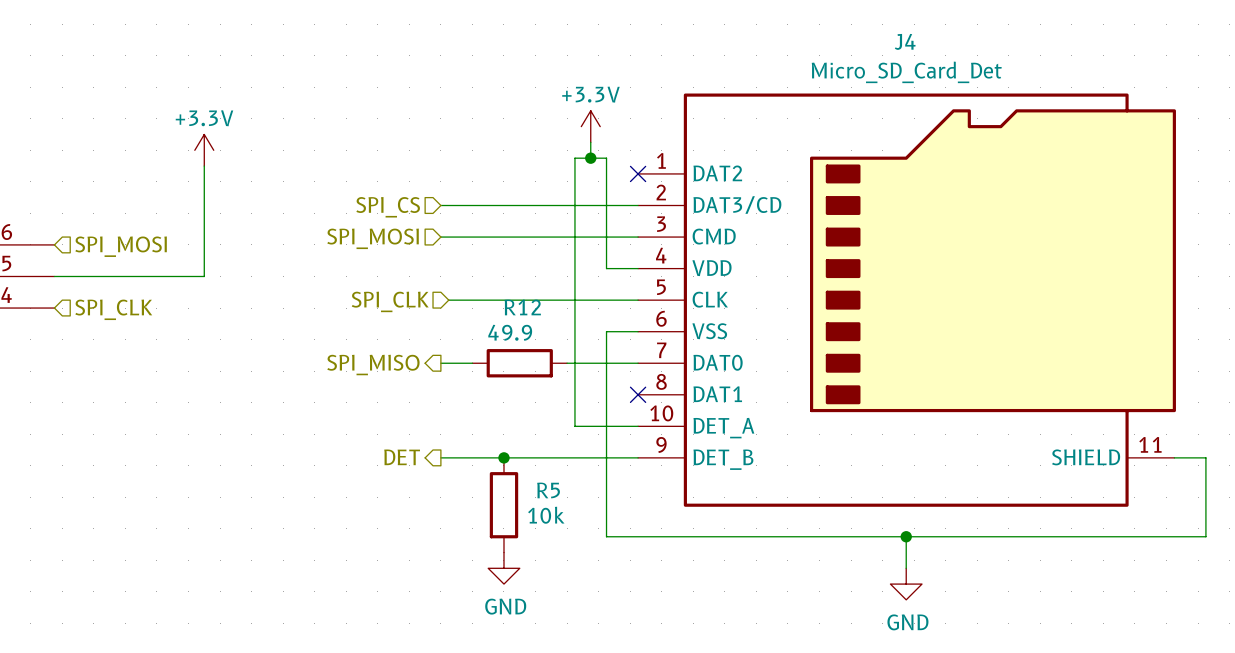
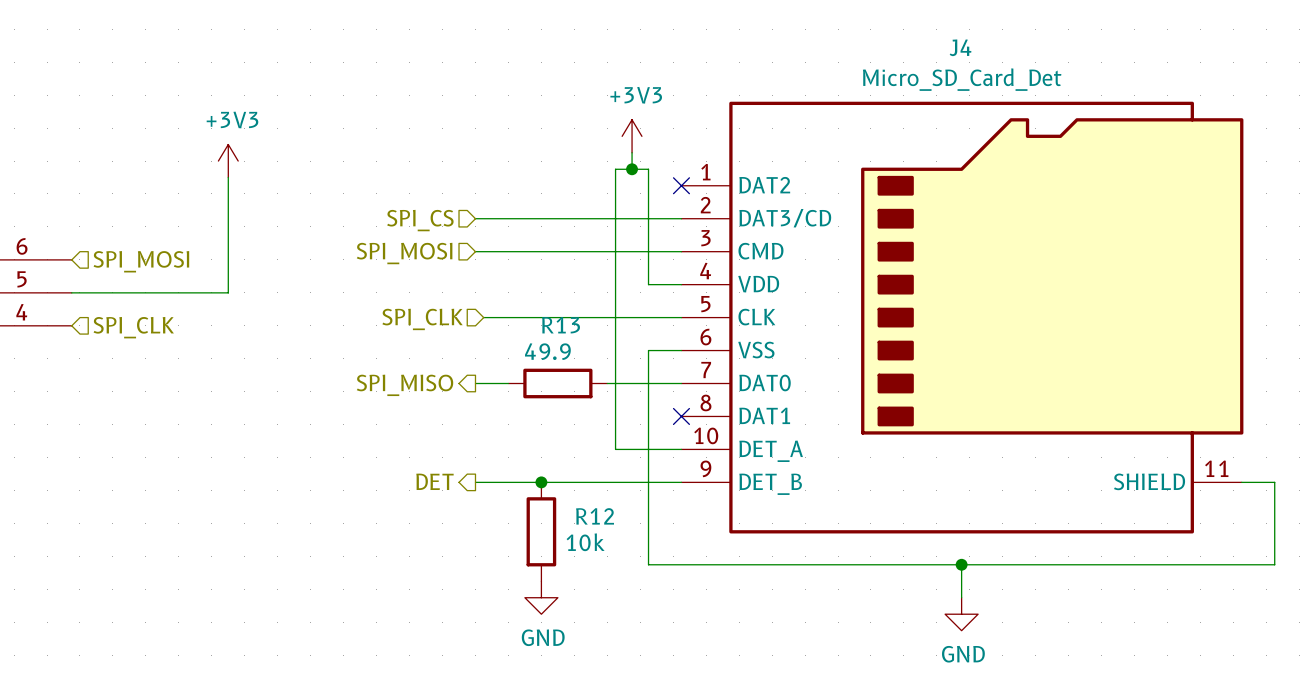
power symbol: +3.3V (590, 126) -> +3V3 (632, 136)
power symbol: +3.3V (204, 150) -> +3V3 (228, 161)
R12 name: R12 (522, 307) -> R13 (560, 325)
R5 name: R5 (548, 490) -> R12 (595, 516)

